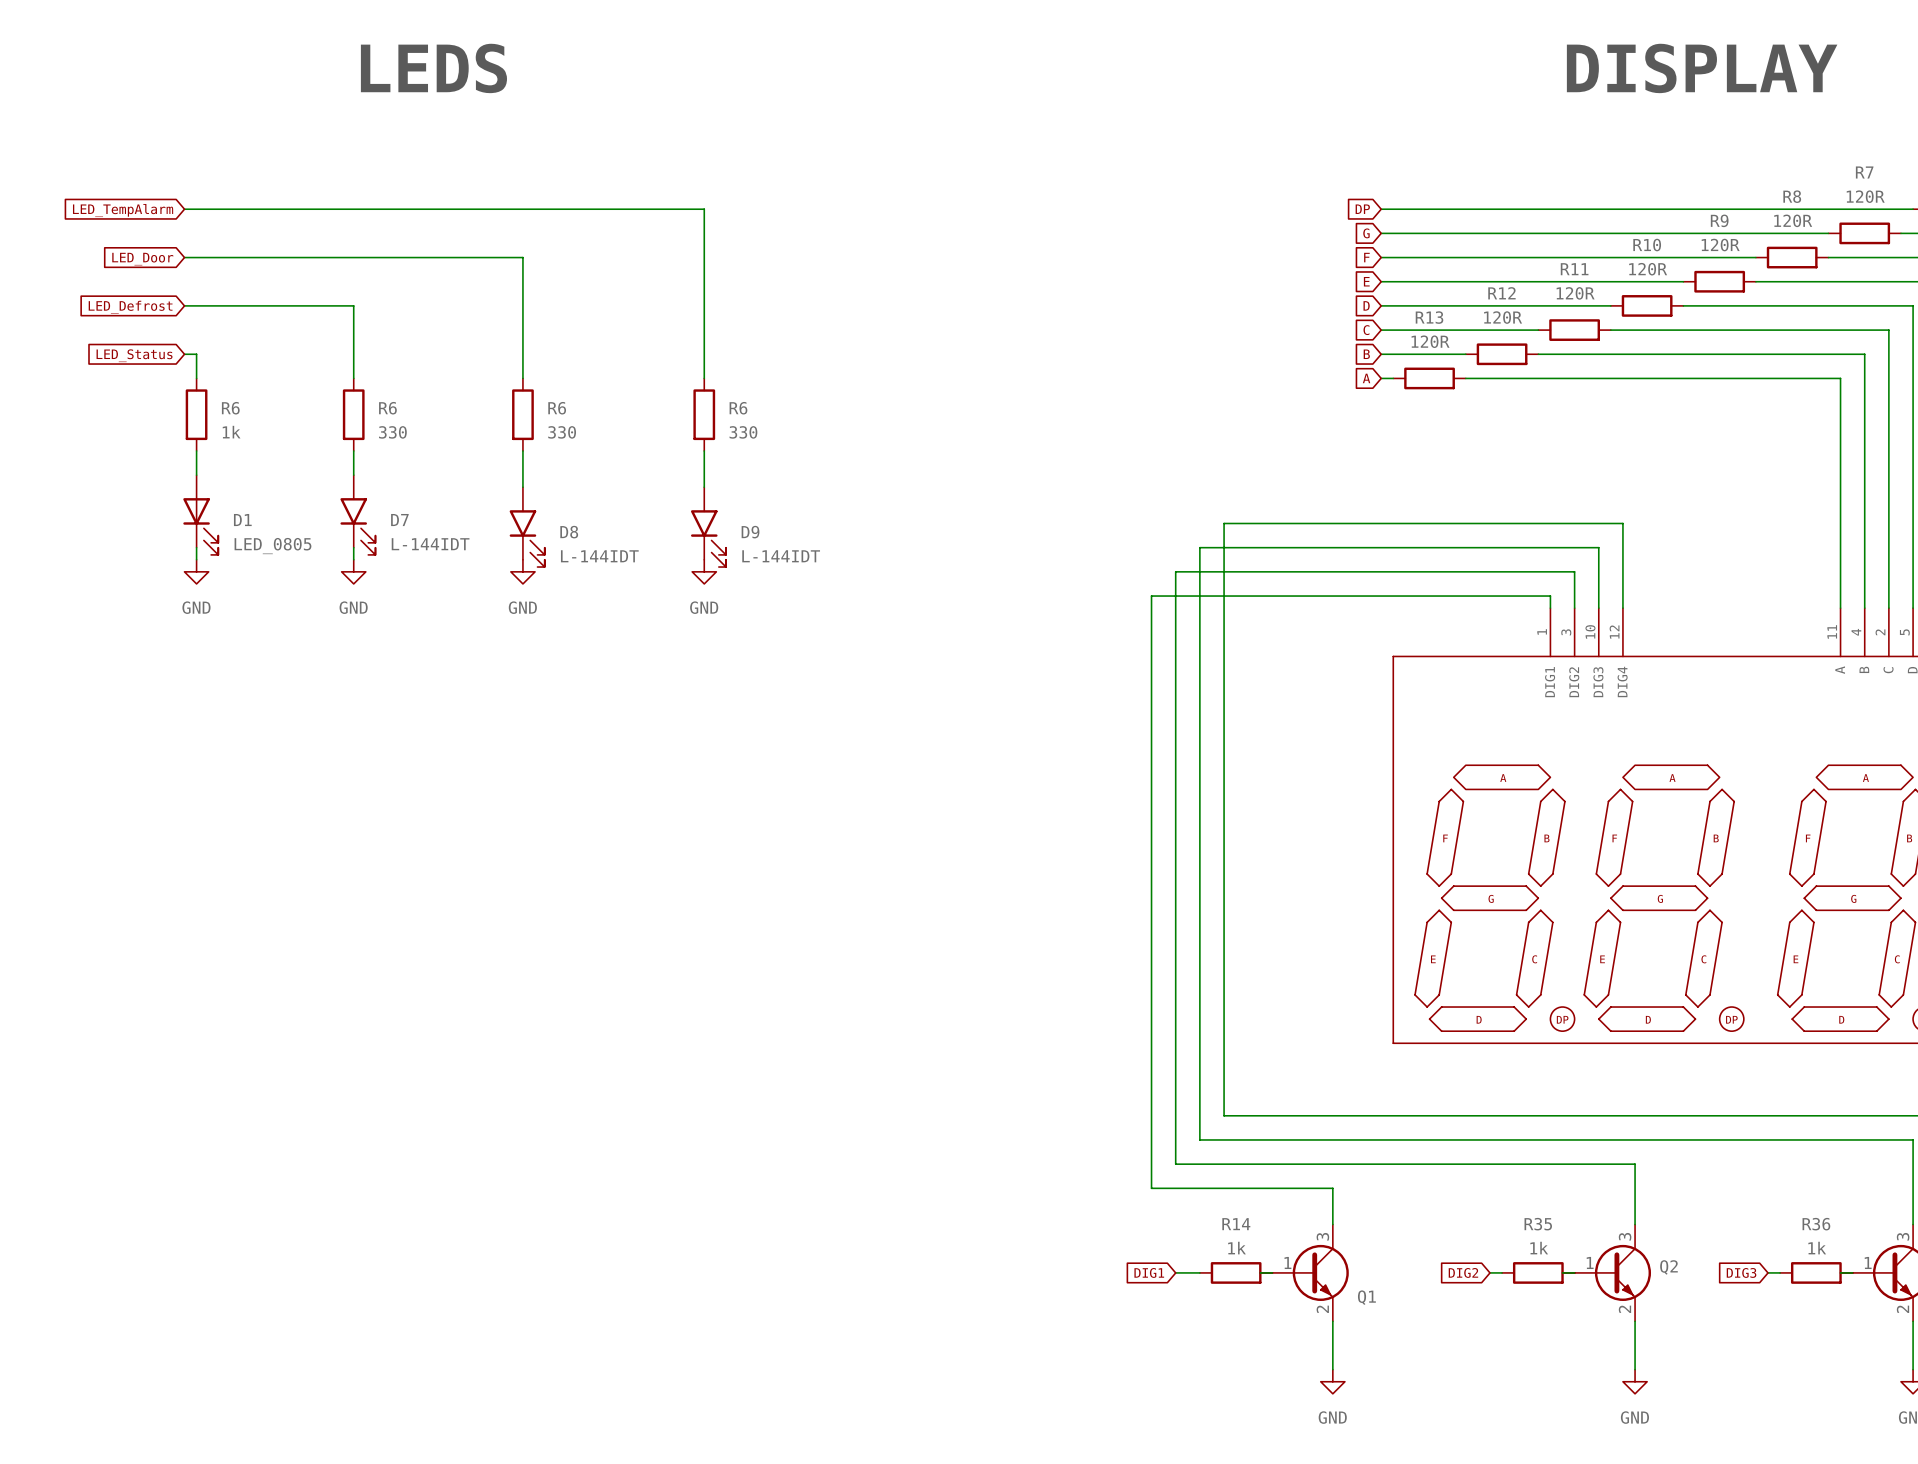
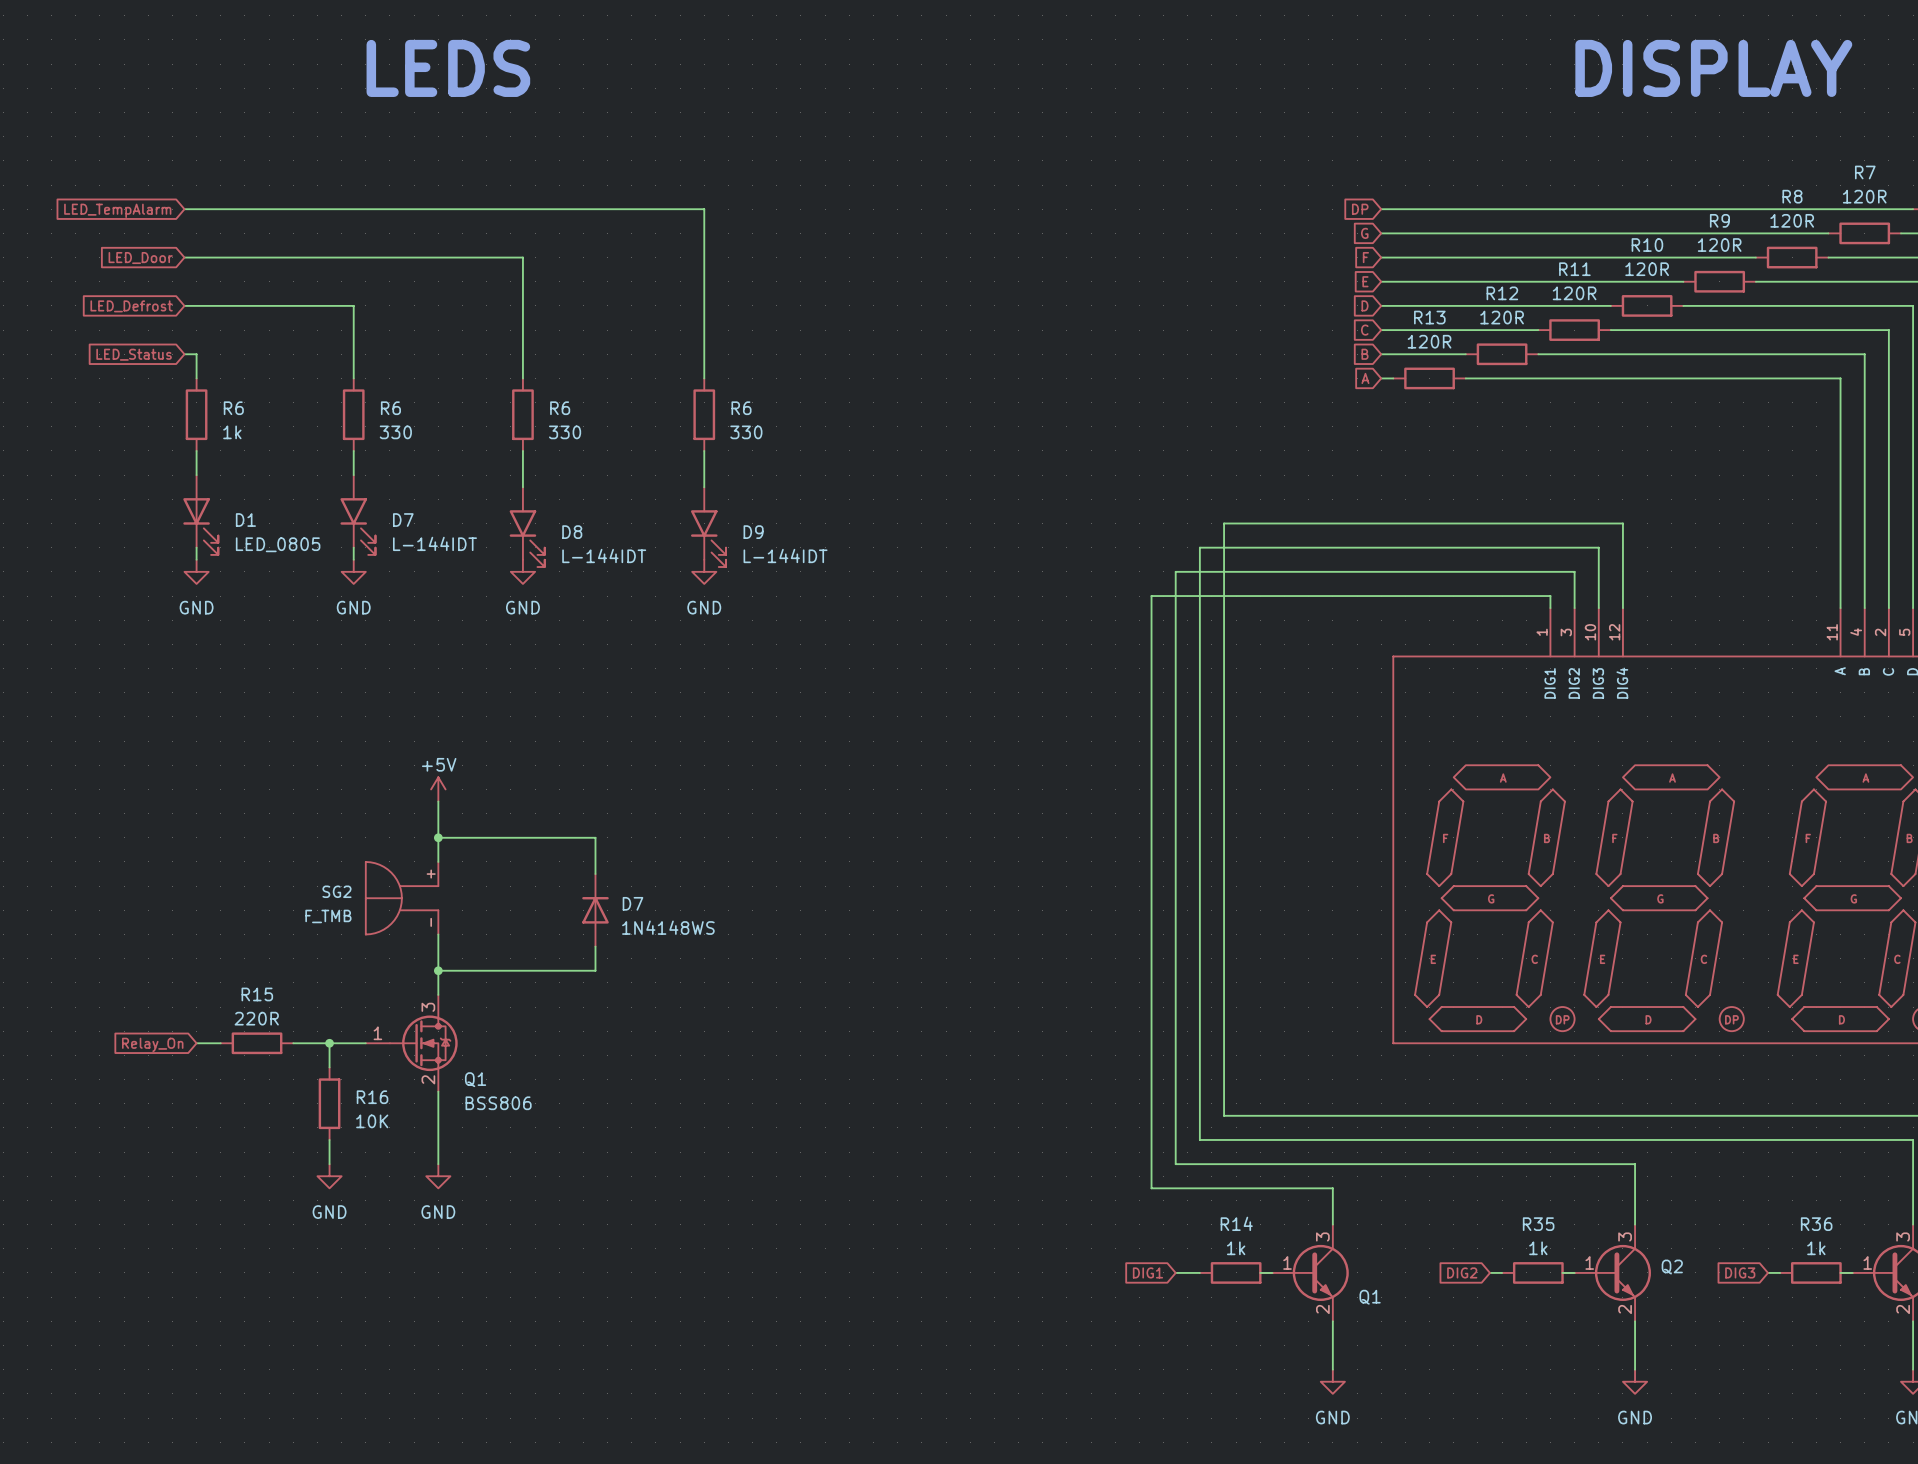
power symbol: none -> +5V (438, 789)
wire: none -> (438, 801) (438, 861)
wire: none -> (438, 837) (595, 837) (595, 874)
junction: none -> (438, 837)
SG2: none -> F_TMB (402, 898)
D7: none -> 1N4148WS (595, 910)
wire: none -> (438, 934) (438, 994)
wire: none -> (595, 946) (595, 970) (438, 970)
junction: none -> (438, 970)
wire: none -> (196, 1043) (220, 1043)
R15: none -> 220R (257, 1043)
wire: none -> (293, 1043) (365, 1043)
wire: none -> (329, 1043) (329, 1067)
junction: none -> (329, 1043)
Q1: none -> BSS806 (411, 1043)
global label: none -> Relay_On (152, 1044)
wire: none -> (438, 1091) (438, 1164)
R16: none -> 10K (329, 1103)
wire: none -> (329, 1139) (329, 1164)
power symbol: none -> GND (329, 1176)
power symbol: none -> GND (438, 1176)

